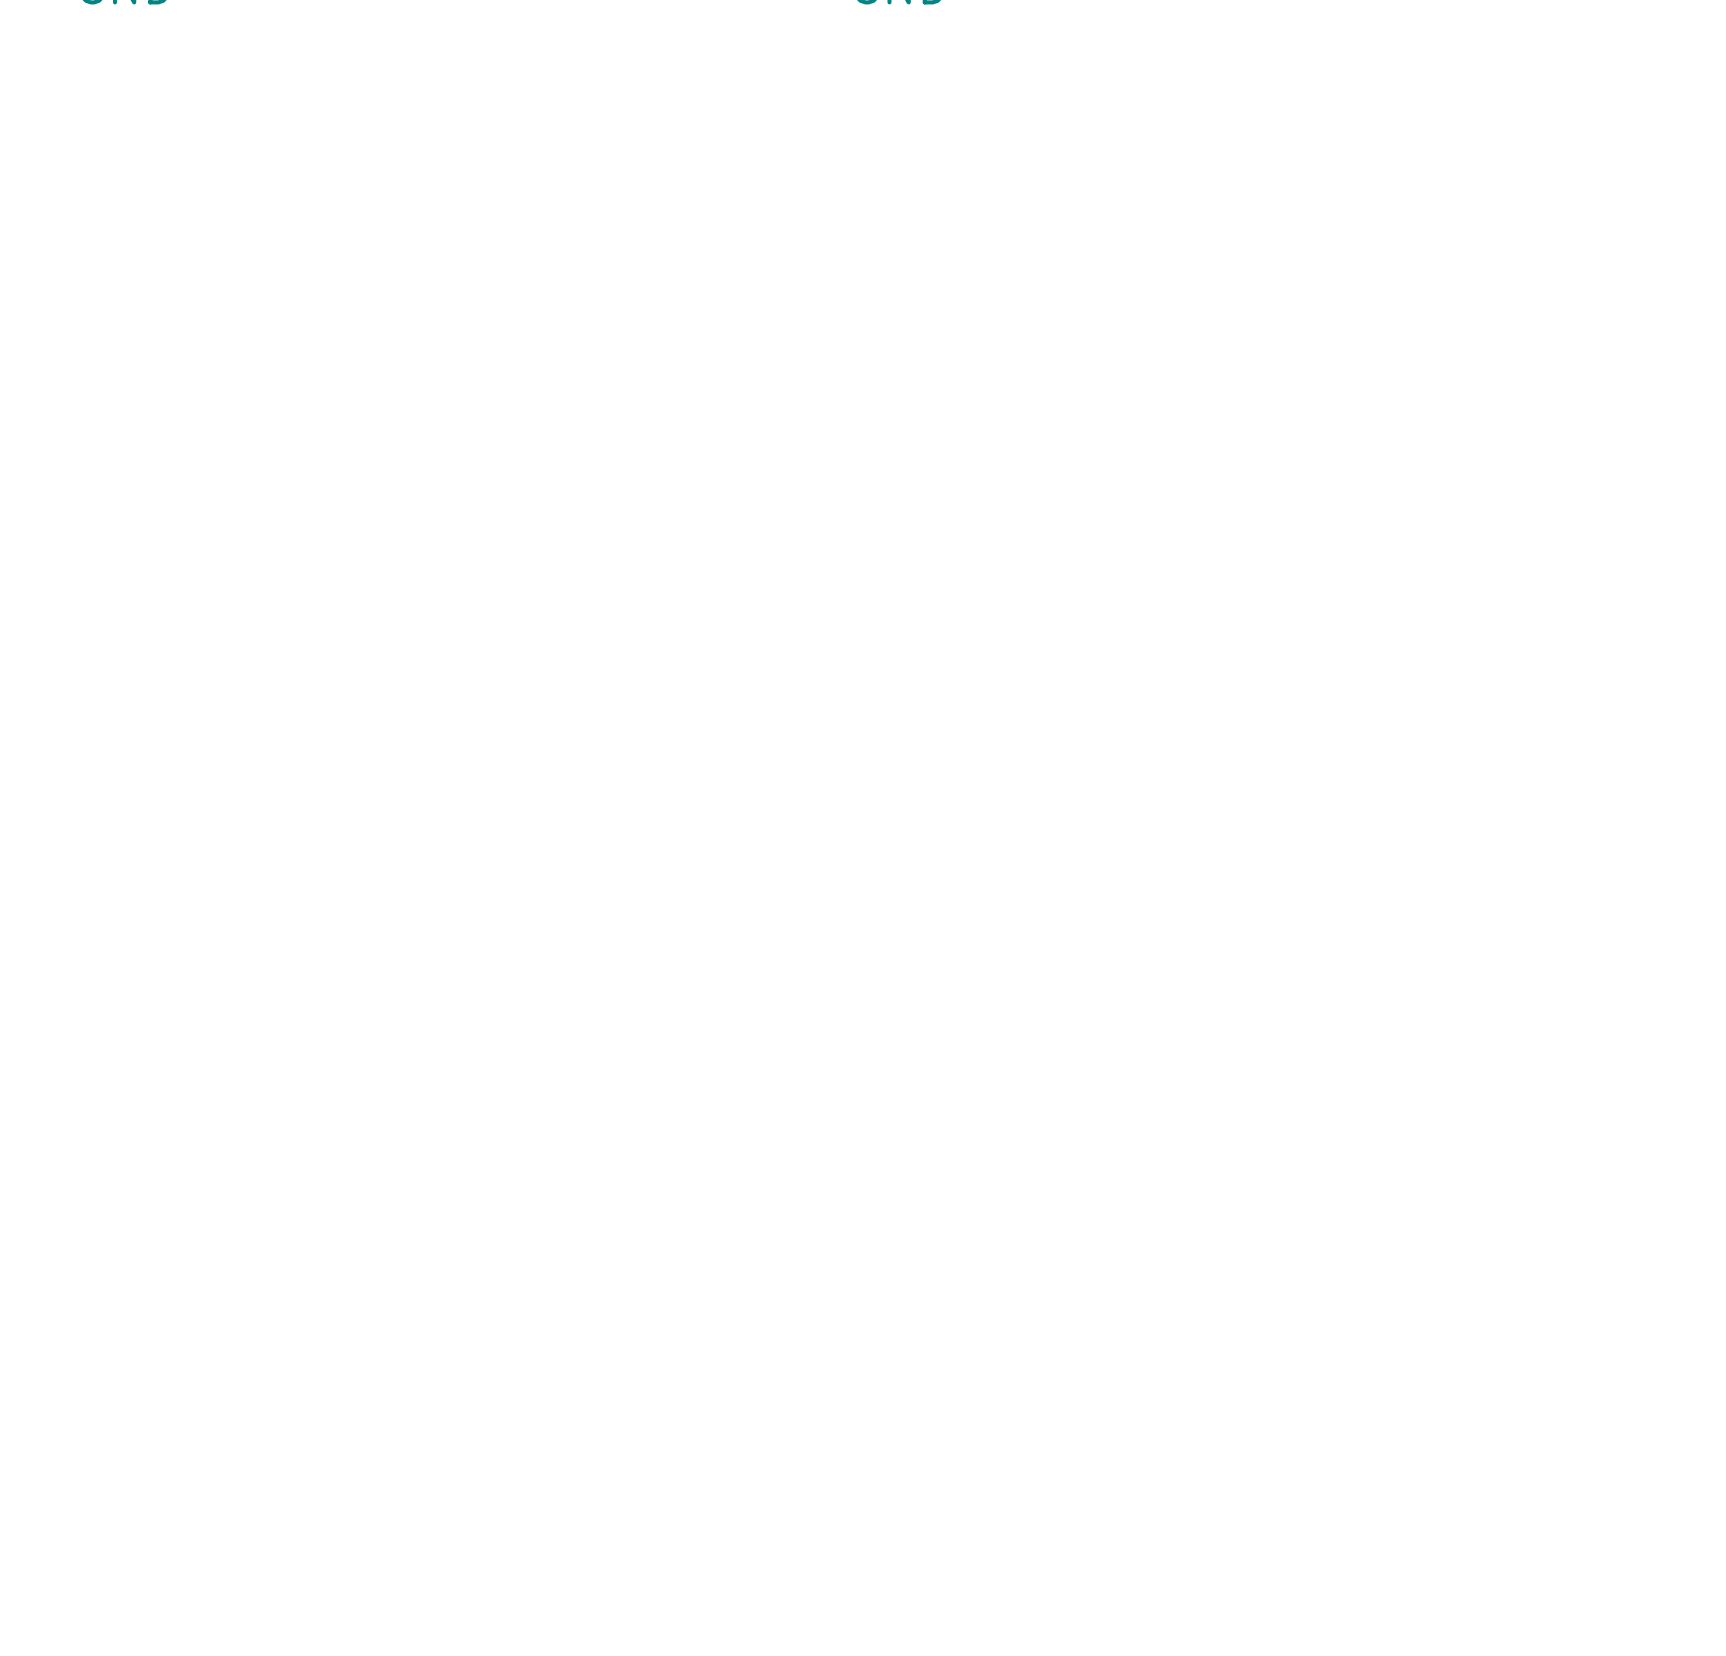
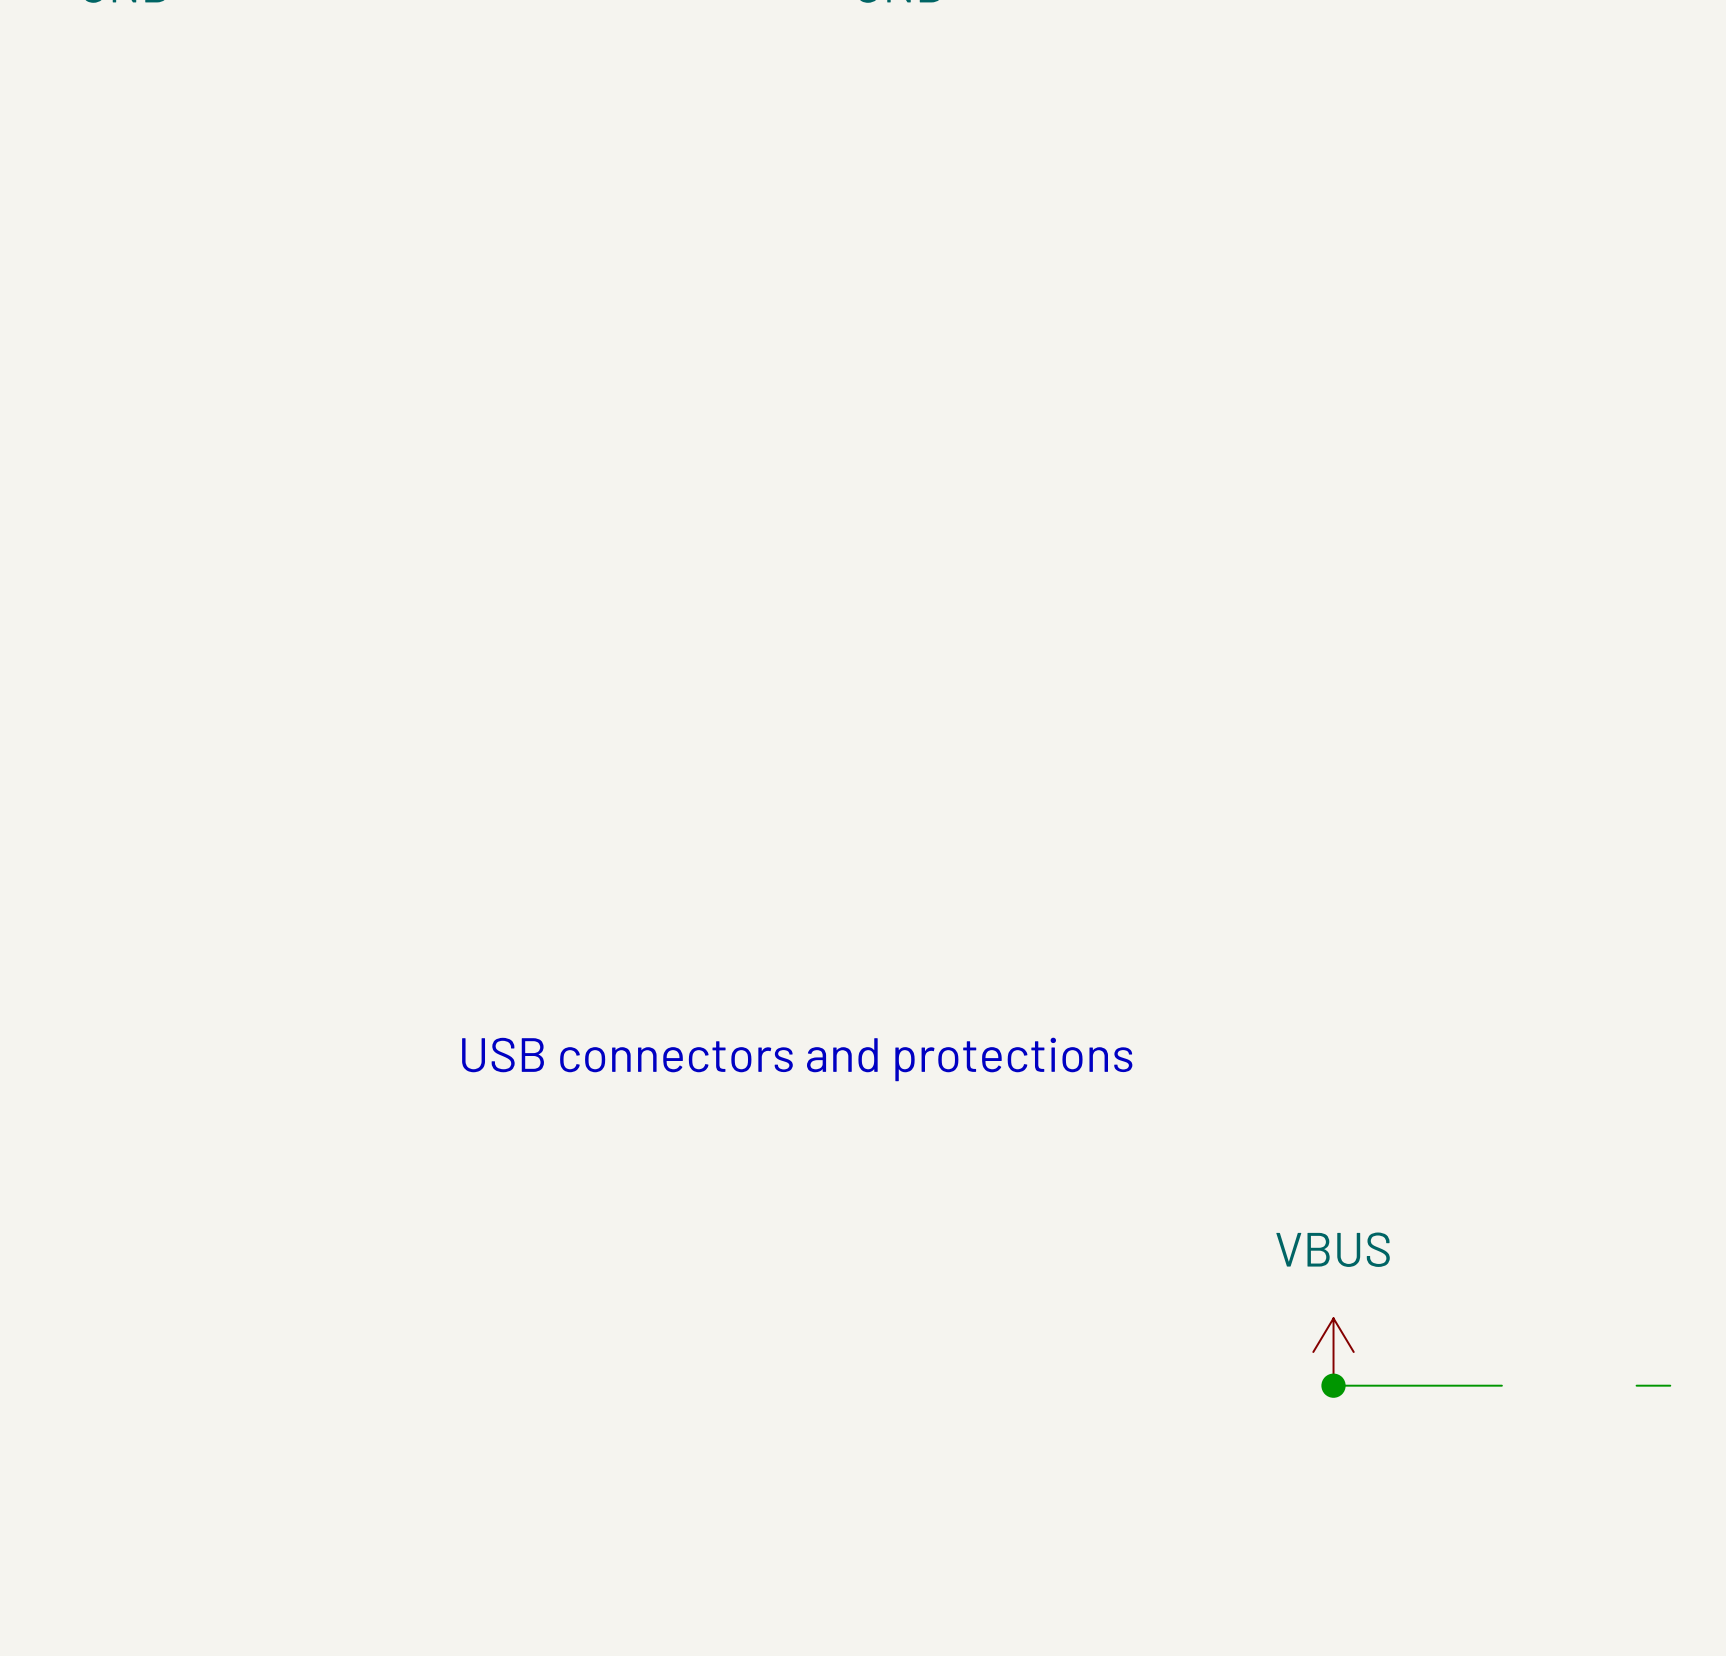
text: none -> USB connectors and protections (797, 1059)
power symbol: none -> VBUS (1333, 1352)
wire: none -> (1333, 1385) (1501, 1385)
junction: none -> (1333, 1385)
wire: none -> (1636, 1385) (1670, 1385)

